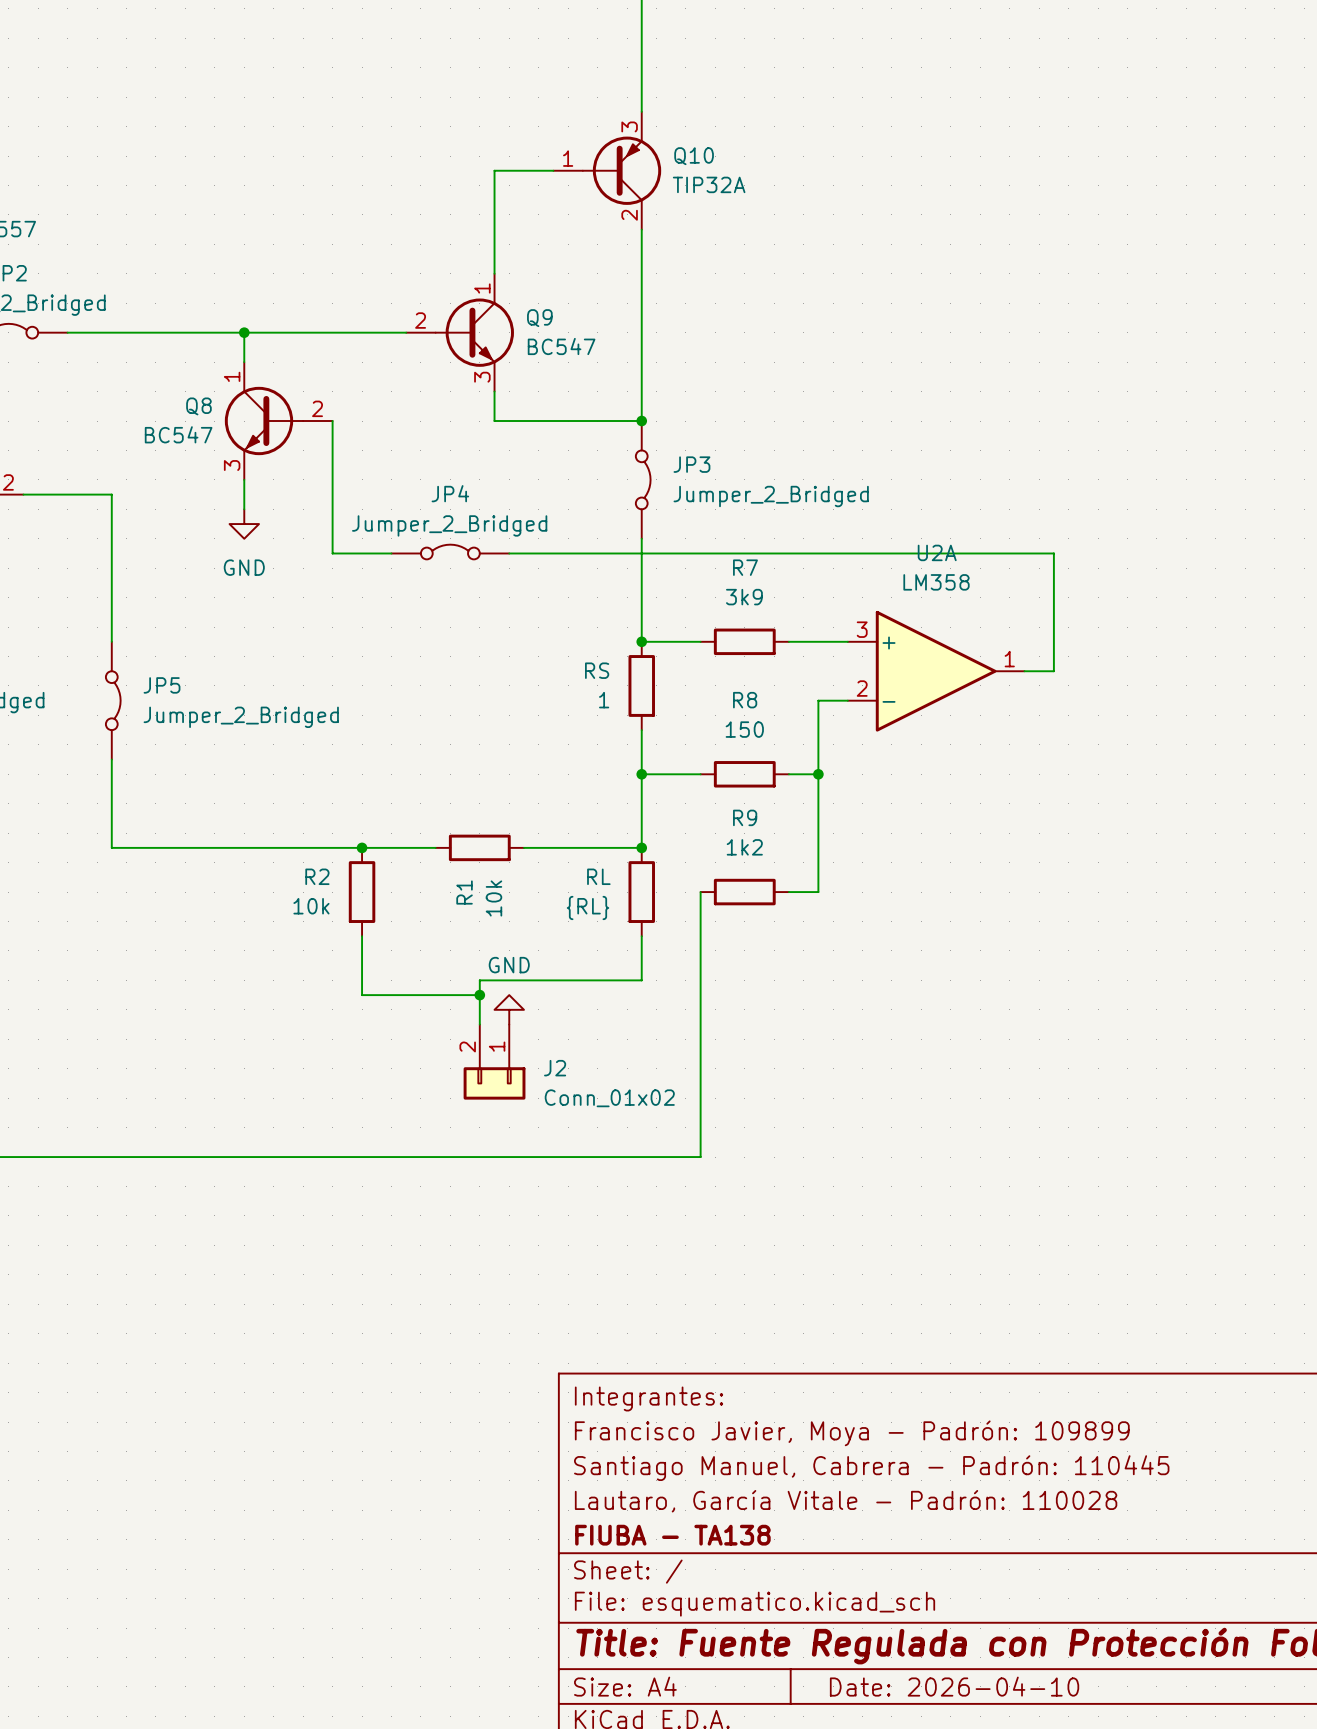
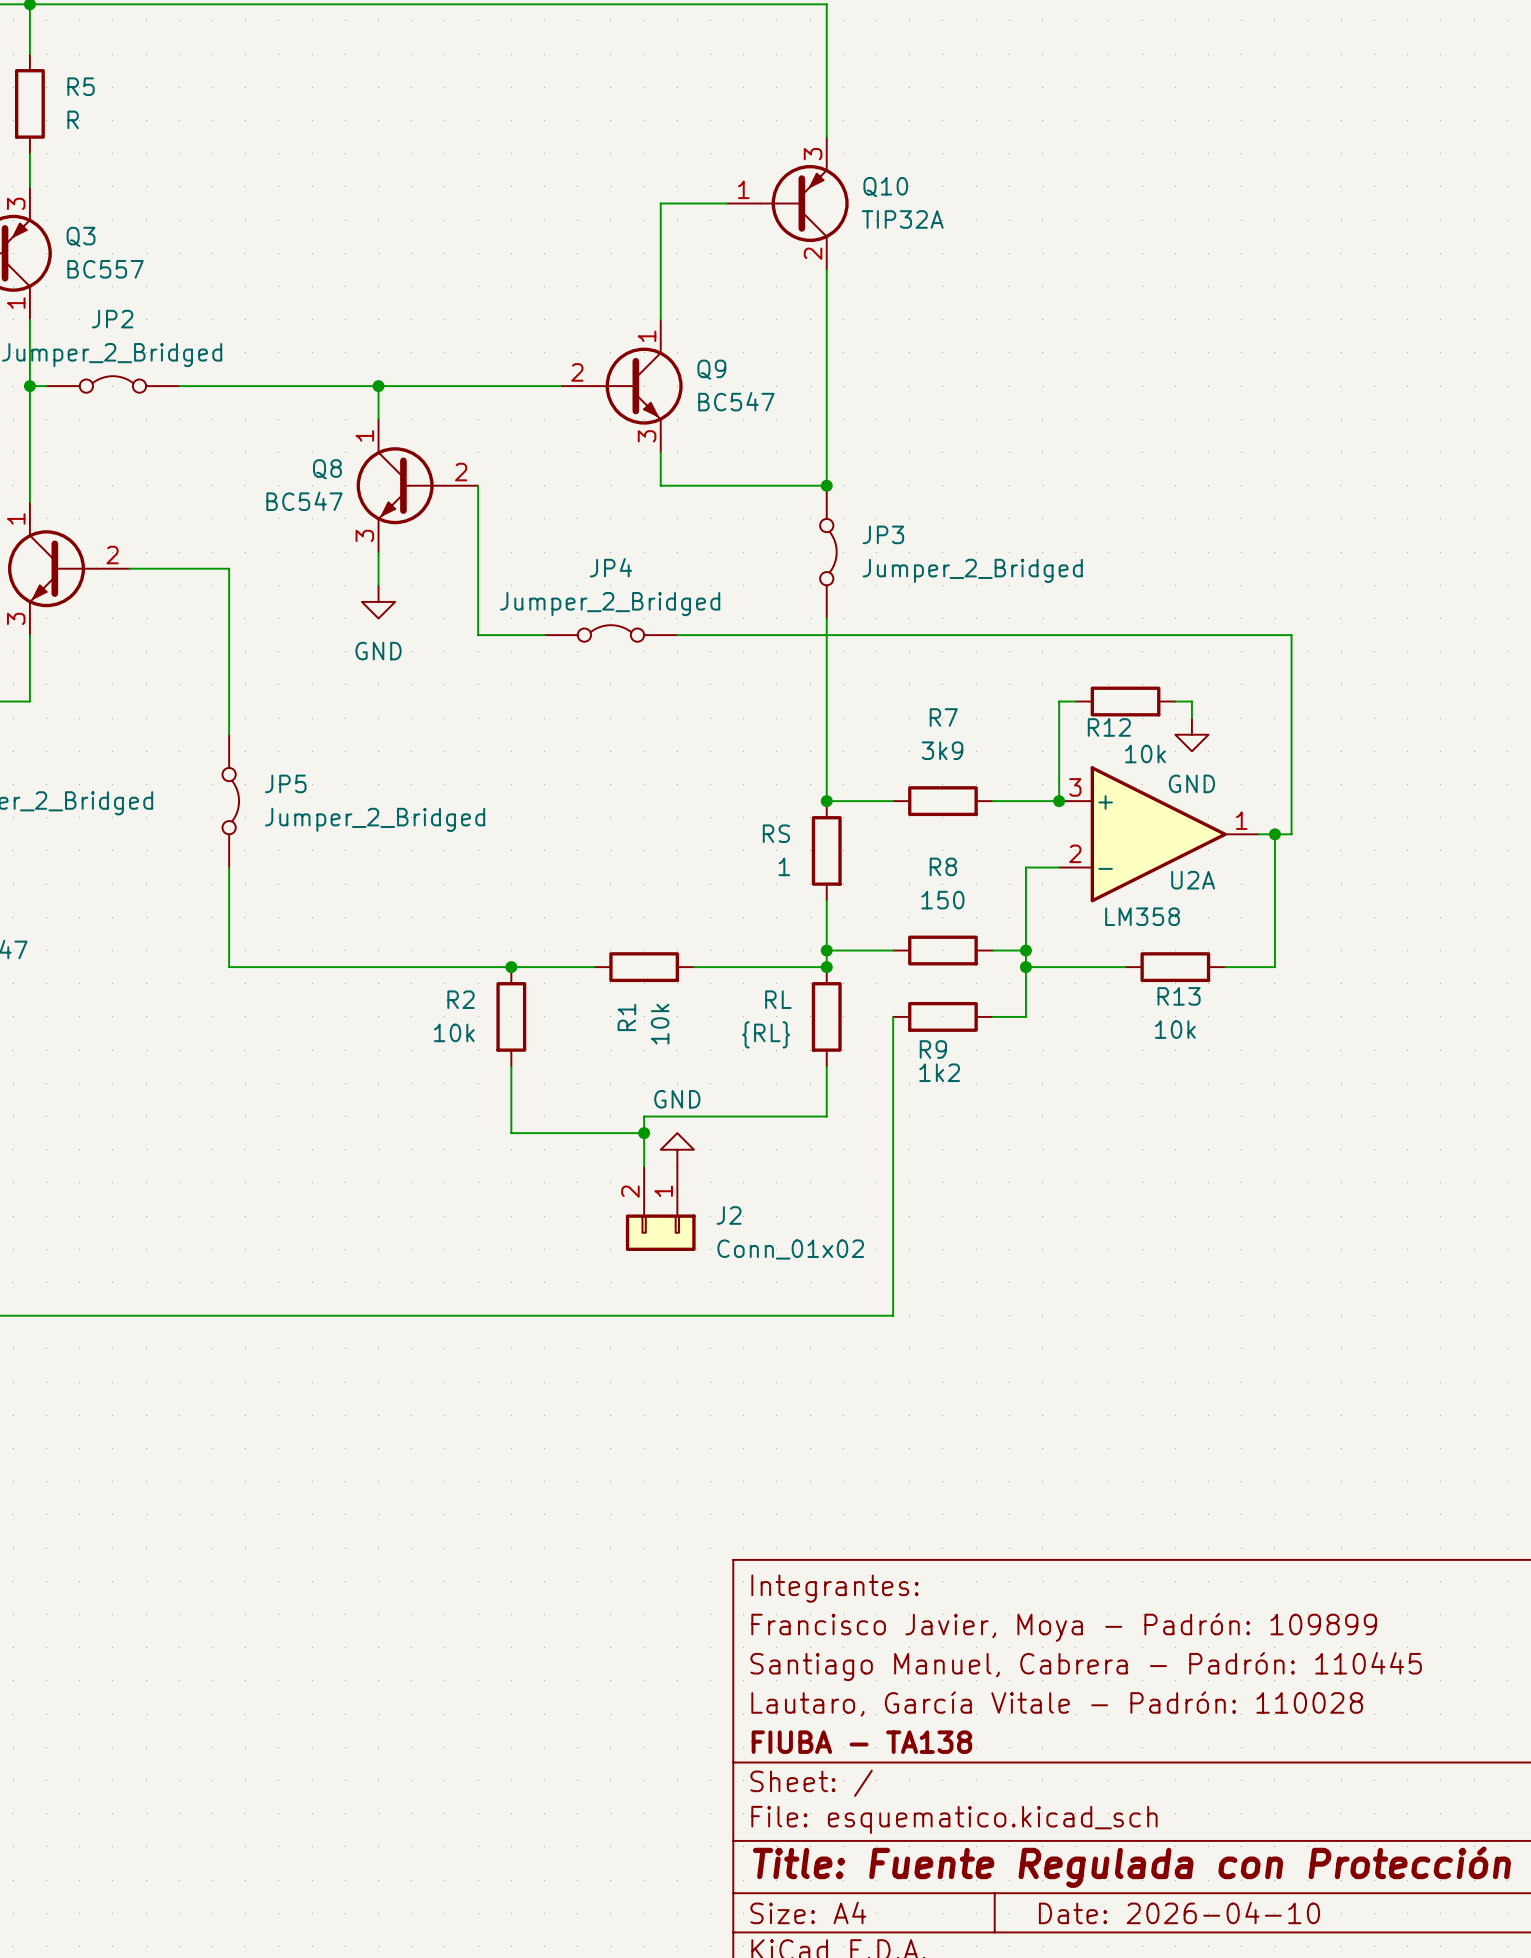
U2A name position: U2A (937, 552) -> U2A (1193, 880)
U2A value position: LM358 (936, 582) -> LM358 (1142, 916)
wire: none -> (1075, 701) (1059, 701) (1059, 801)
R12: none -> 10k (1125, 701)
wire: none -> (1175, 701) (1191, 701) (1191, 718)
wire: (641, 641) (700, 641) -> (826, 734) (826, 801) (893, 801)
junction: (641, 641) -> none
R7 position: (744, 641) -> (942, 801)
wire: (788, 641) (847, 641) -> none
power symbol: none -> GND (1191, 734)
U2A position: (936, 671) -> (1158, 834)
wire: (1024, 671) (1053, 671) -> (1258, 834) (1291, 834) (1291, 767)
RS position: (641, 685) -> (826, 850)
junction: none -> (826, 801)
wire: (818, 700) (818, 759) -> (1025, 801) (992, 801)
junction: none -> (1059, 801)
wire: (641, 730) (641, 789) -> none
wire: none -> (1274, 834) (1274, 967) (1225, 967)
junction: none -> (1274, 834)
wire: none -> (1025, 867) (1059, 867)
wire: (641, 774) (700, 774) -> (826, 950) (893, 950)
junction: (641, 774) -> none
R8 position: (744, 774) -> (942, 950)
wire: (788, 774) (818, 774) -> (992, 950) (1025, 950)
junction: (818, 774) -> none
R9 name position: R9 (745, 817) -> R9 (933, 1049)
junction: none -> (826, 950)
junction: none -> (1025, 950)
R9 value position: 1k2 (744, 847) -> 1k2 (939, 1072)
wire: none -> (1025, 967) (1125, 967)
junction: none -> (1025, 967)
R13: none -> 10k (1175, 967)

